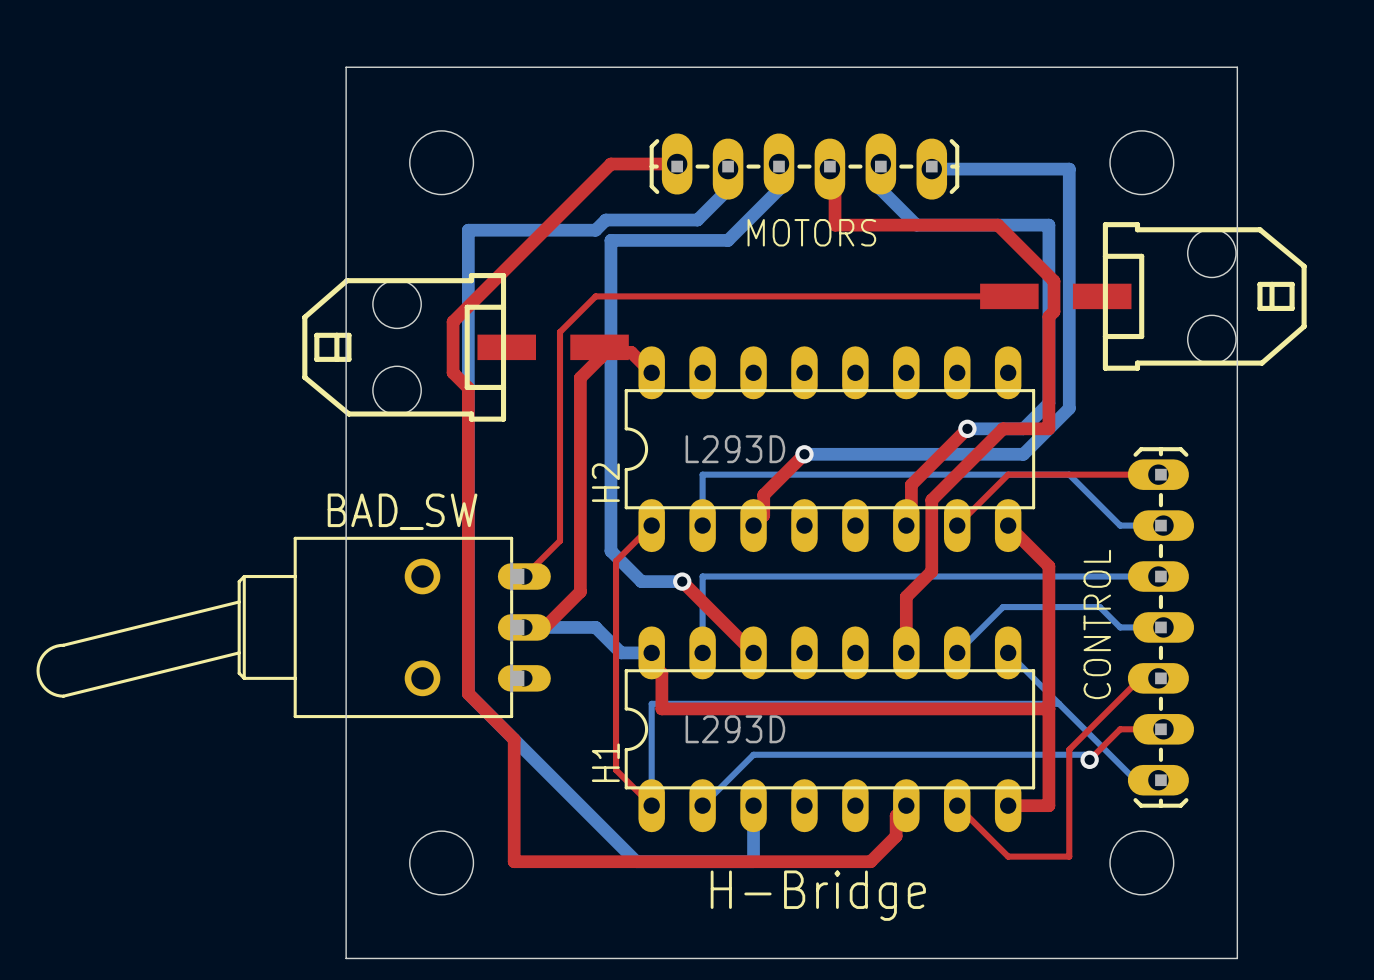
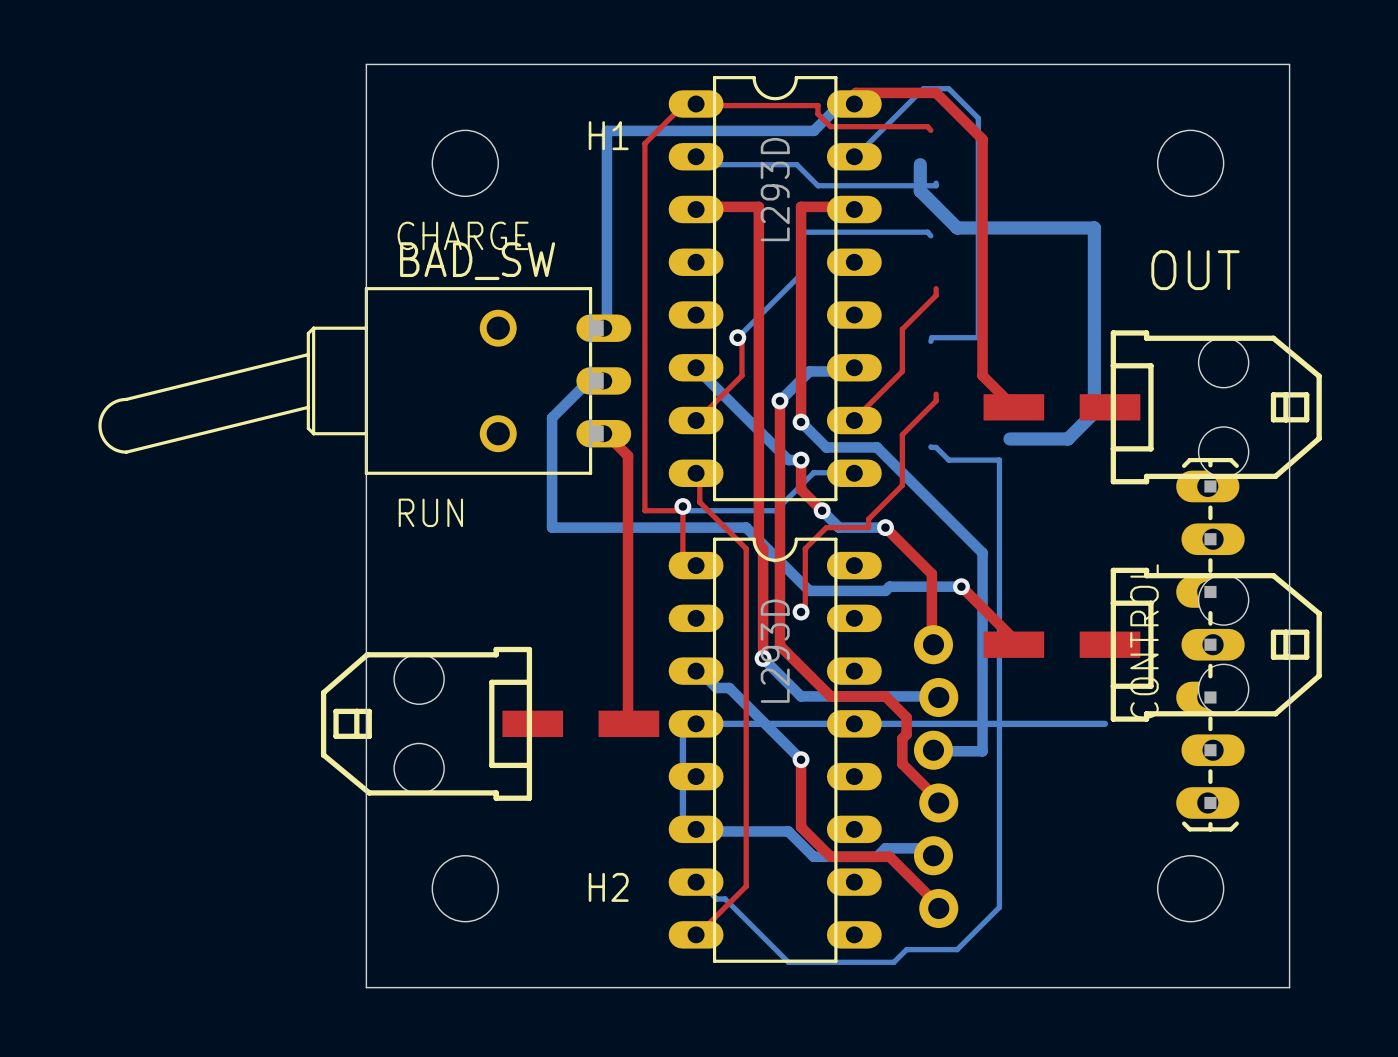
top track: none -> (854, 103) (855, 92) (936, 92) (982, 139) (982, 375) (1013, 407)
bottom track: none -> (854, 103) (839, 105) (813, 130) (606, 130) (606, 325) (603, 328)
top track: none -> (930, 130) (927, 126) (830, 126) (817, 114) (817, 105) (699, 105) (696, 103) (695, 105) (682, 105) (644, 143) (644, 510) (682, 510)
bottom track: none -> (696, 156) (704, 164) (796, 164) (817, 185) (936, 185) (936, 183)
bottom track: none -> (854, 156) (923, 88) (948, 88) (978, 118) (978, 337) (931, 337) (930, 341)
top track: (677, 164) (610, 164) (453, 321) (453, 372) (468, 388) (468, 693) (514, 739) (514, 861) (870, 861) (896, 836) (896, 815) (906, 805) -> none
bottom track: (779, 164) (779, 189) (728, 240) (610, 240) (610, 551) (641, 581) (682, 581) -> none
MOTORS: (804, 166) -> none
bottom track: (728, 169) (728, 189) (697, 220) (605, 220) (595, 230) (468, 230) (468, 693) (636, 861) (753, 861) (753, 805) -> none
top track: (829, 169) (835, 174) (835, 225) (997, 225) (1054, 281) (1054, 311) (1048, 316) (1048, 428) (1003, 428) (931, 500) (931, 571) (906, 596) (906, 652) -> none
bottom track: (931, 169) (1069, 169) (1069, 408) (1023, 454) (804, 454) -> none
top track: none -> (696, 209) (699, 206) (758, 206) (758, 544) (763, 548) (763, 658)
top track: none -> (854, 209) (851, 206) (801, 206) (801, 422)
text: none -> CHARGE (463, 235)
bottom track: none -> (930, 235) (927, 232) (801, 232) (801, 274) (737, 337)
text: none -> OUT (1195, 270)
top track: none -> (936, 288) (936, 295) (902, 329) (902, 371) (854, 420)
top track: (1009, 296) (595, 296) (560, 332) (560, 540) (524, 576) -> none
part position: (1143, 296) -> (1152, 407)
top track: none -> (737, 337) (741, 341) (741, 375) (696, 420)
via: none -> (737, 337)
part: (465, 347) -> none
bottom track: none -> (696, 367) (788, 460) (801, 460)
bottom track: none -> (854, 367) (851, 371) (809, 371) (779, 401)
bottom track: none -> (603, 380) (598, 388) (581, 388) (552, 417) (552, 527) (746, 527) (809, 590) (885, 590) (889, 586) (961, 586)
top track: (651, 372) (631, 352) (600, 352) (599, 347) (600, 357) (580, 377) (580, 591) (544, 627) (524, 627) -> none
top track: none -> (936, 394) (936, 401) (902, 434) (902, 485) (868, 519) (868, 527) (826, 527) (805, 548) (805, 607) (801, 612)
top track: none -> (779, 401) (779, 645) (830, 696) (885, 696) (906, 717) (906, 734) (902, 738) (902, 763) (936, 797) (936, 801) (938, 802)
via: none -> (779, 401)
bottom track: none -> (801, 422) (826, 447) (877, 447) (982, 552) (982, 751) (933, 750)
via: none -> (801, 422)
top track: none -> (603, 433) (628, 455) (628, 723)
top track: (967, 428) (911, 484) (911, 520) (906, 525) -> none
via: (967, 428) -> none
bottom track: none -> (930, 446) (936, 447) (948, 460) (999, 460) (999, 907) (957, 949) (906, 949) (893, 962) (788, 962) (725, 899) (716, 899) (699, 882) (696, 882)
top track: none -> (801, 460) (801, 489) (822, 510)
via: none -> (801, 460)
H2 rotation: 0° (829, 449) -> 90° clockwise (775, 750)
H2 position: (829, 449) -> (775, 750)
top track: (804, 454) (763, 495) (763, 515) (753, 525) -> none
via: (804, 454) -> none
top track: none -> (696, 473) (699, 476) (699, 502) (746, 548) (746, 886) (696, 934)
bottom track: none -> (854, 473) (813, 472) (775, 510) (687, 510) (682, 506)
top track: (1158, 474) (1008, 474) (957, 525) -> none
H2 name position: H2 (605, 482) -> H2 (608, 887)
top track: none -> (682, 506) (682, 552) (696, 565)
via: none -> (682, 506)
bottom track: none -> (822, 510) (839, 527) (885, 527)
via: none -> (822, 510)
text: none -> RUN (430, 512)
top track: none -> (885, 527) (931, 574) (931, 641) (933, 644)
via: none -> (885, 527)
top track: (651, 525) (616, 561) (616, 770) (651, 805) -> none
bottom track: (702, 525) (702, 474) (1069, 474) (1120, 525) (1163, 525) -> none
top track: (1008, 525) (1048, 566) (1048, 805) (1008, 805) -> none
top track: none -> (961, 586) (1012, 637) (1013, 644)
via: none -> (961, 586)
bottom track: (1158, 576) (702, 576) (702, 652) -> none
top track: (682, 581) (753, 652) -> none
via: (682, 581) -> none
via: none -> (801, 612)
BAD_SW position: (293, 627) -> (364, 380)
bottom track: (524, 627) (595, 627) (621, 652) (651, 652) -> none
part: none -> (1152, 644)
bottom track: (1163, 627) (1120, 627) (1099, 607) (1003, 607) (957, 652) -> none
bottom track: none -> (763, 658) (801, 696) (938, 697)
via: none -> (763, 658)
top track: (651, 652) (651, 663) (661, 673) (661, 708) (1048, 708) -> none
bottom track: none -> (696, 671) (699, 671) (716, 687) (729, 687) (801, 759)
bottom track: (1008, 652) (1135, 780) (1158, 780) -> none
top track: (1158, 678) (1140, 678) (1069, 749) (1069, 856) (1008, 856) (957, 805) -> none
part: none -> (490, 723)
H1 rotation: 0° (829, 729) -> 90° clockwise (775, 288)
H1 position: (829, 729) -> (775, 288)
top track: (1163, 729) (1120, 729) (1089, 759) -> none
top track: none -> (801, 759) (801, 827) (830, 856) (889, 856) (936, 903) (936, 907) (938, 908)
via: none -> (801, 759)
part: none -> (936, 776)
bottom track: (1089, 759) (1084, 754) (753, 754) (702, 805) -> none
via: (1089, 759) -> none
H1 name position: H1 (605, 762) -> H1 (608, 135)
bottom track: none -> (696, 829) (699, 831) (788, 831) (813, 856) (877, 856) (885, 848) (927, 848) (933, 855)
text: H-Bridge (818, 895) -> none

